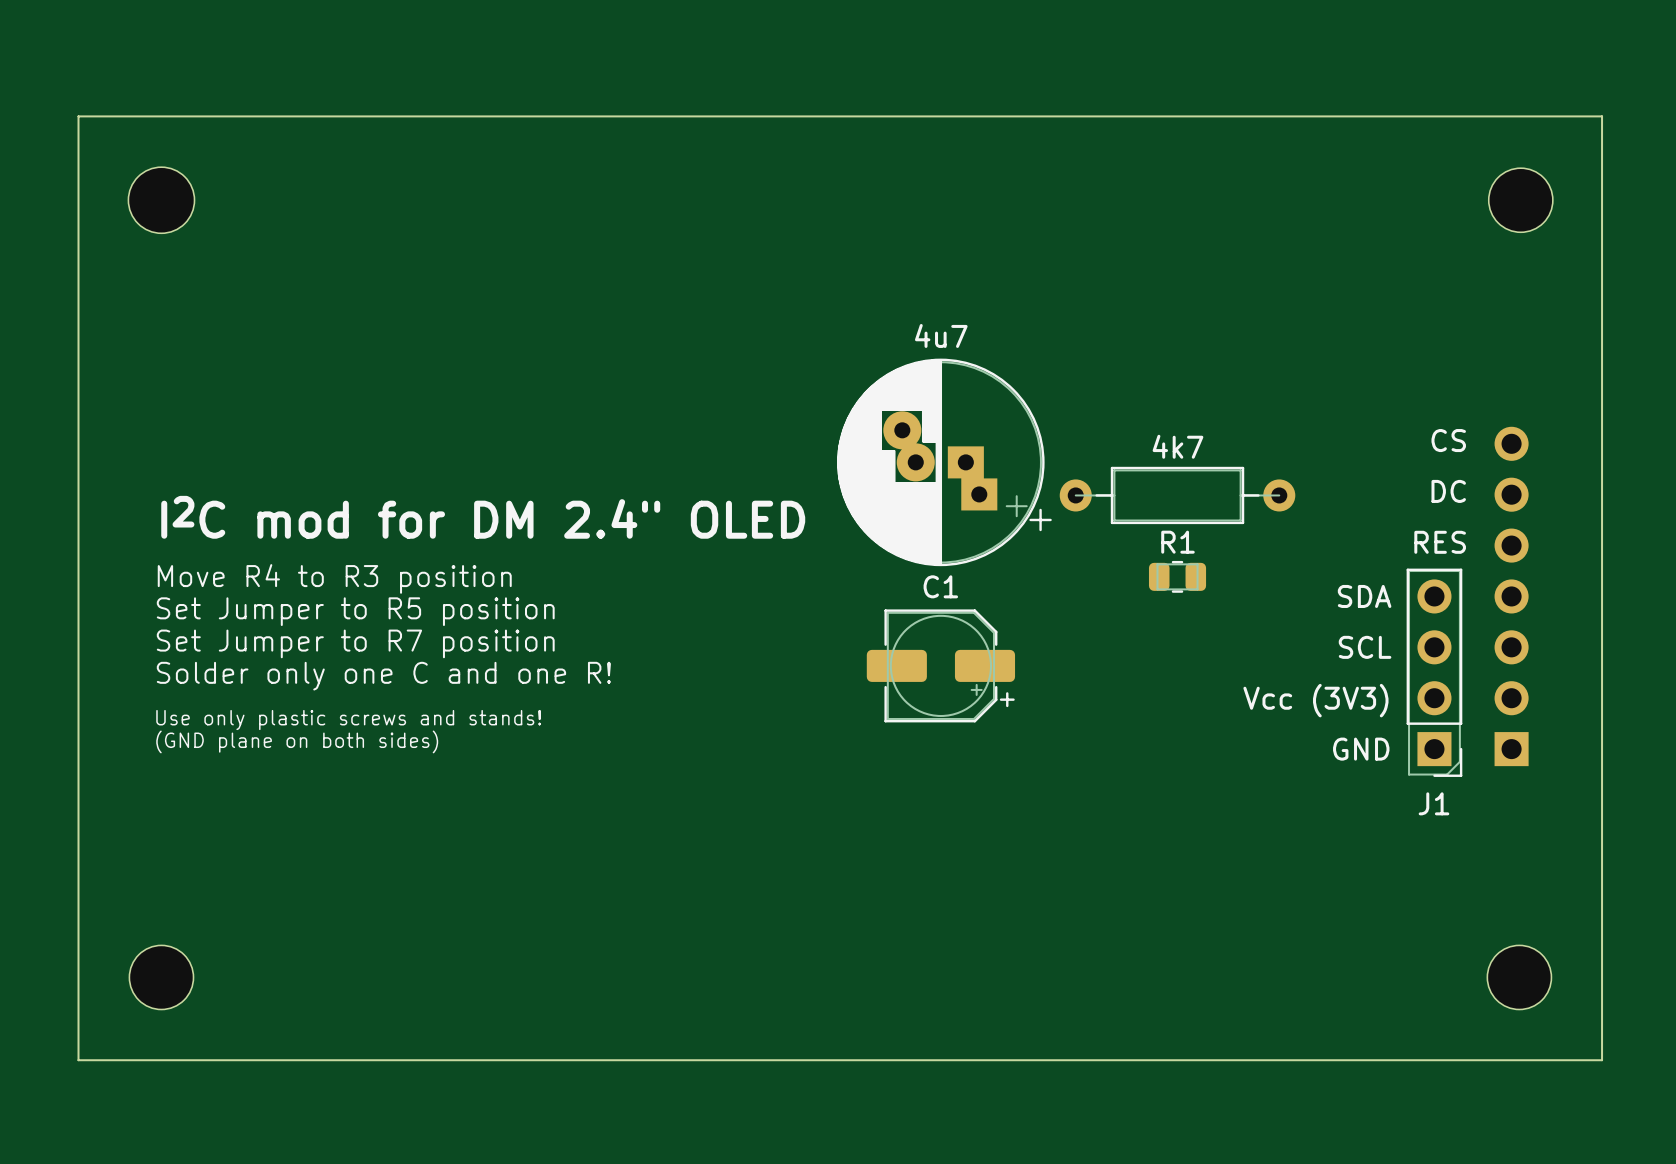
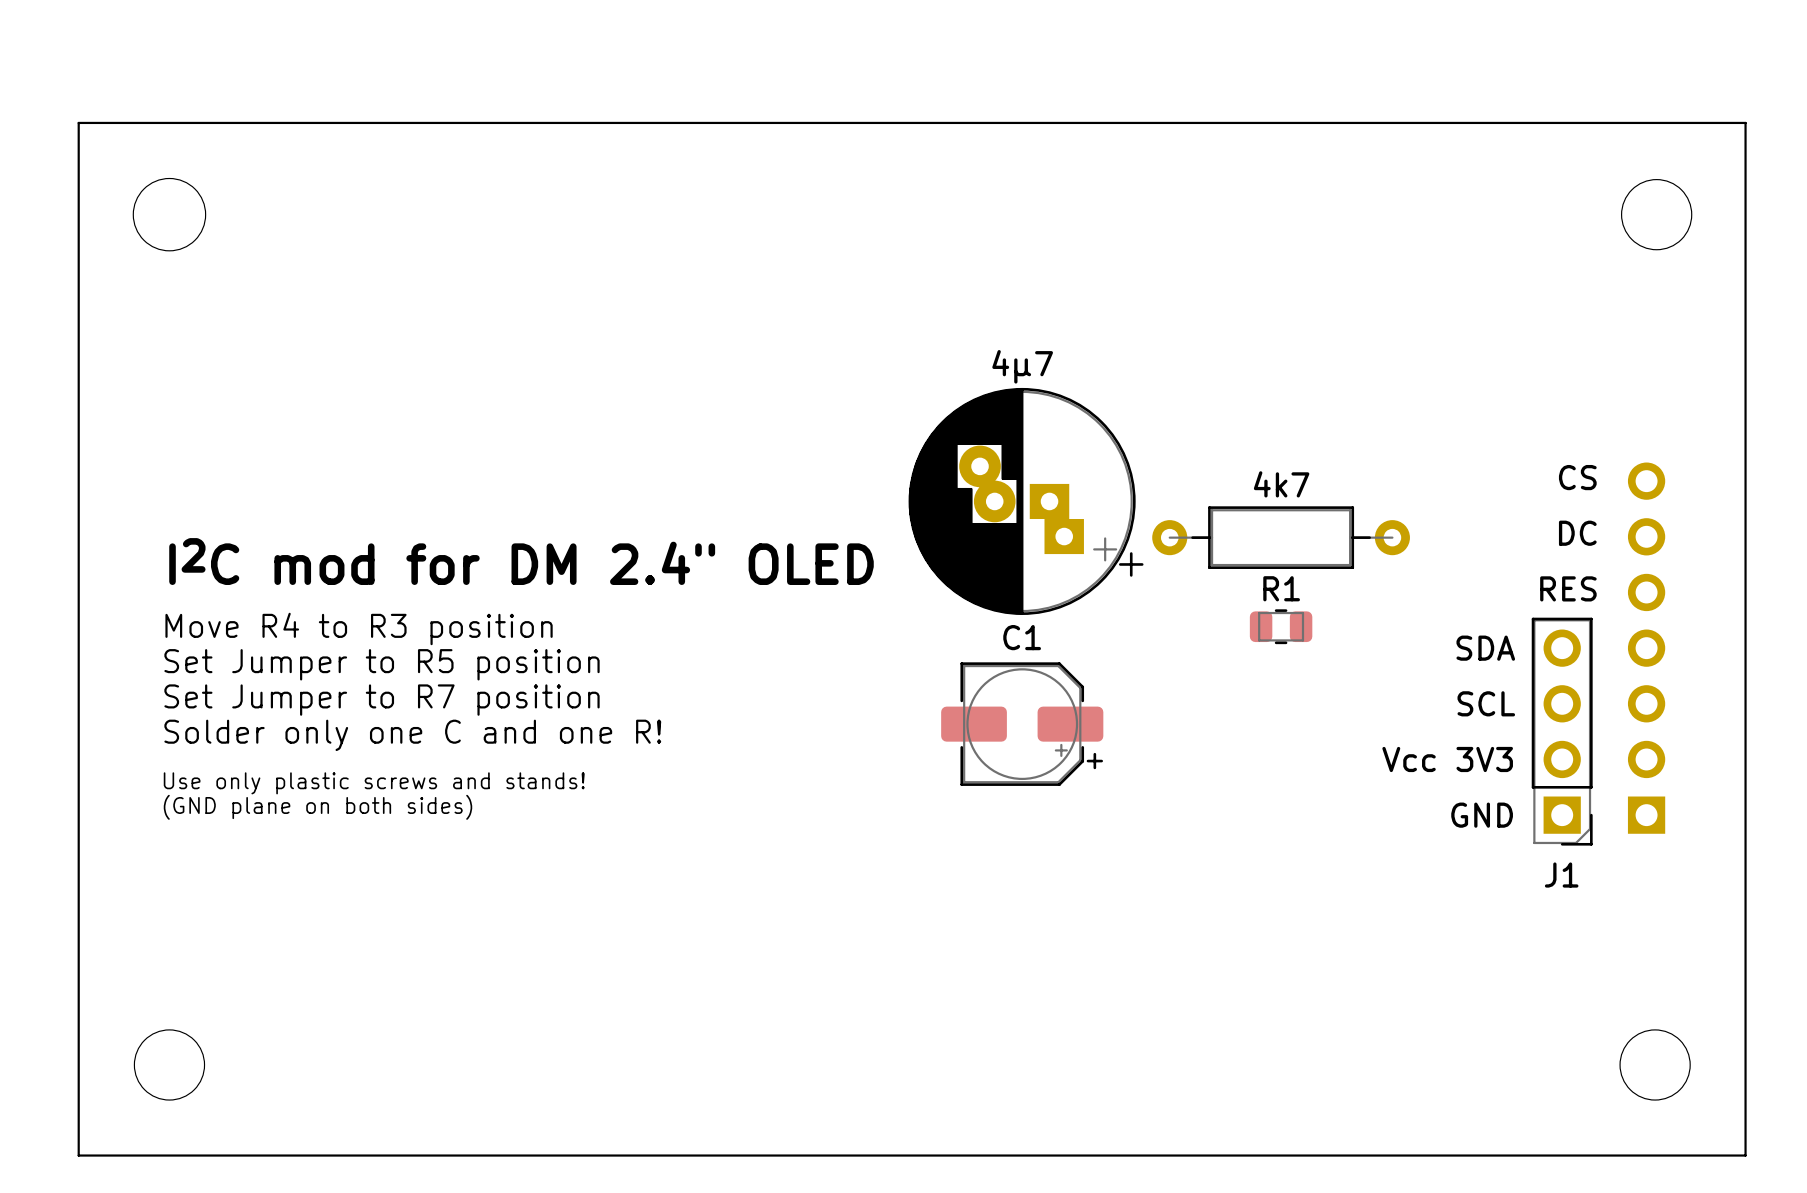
C1 value: 4u7 (941, 335) -> 4µ7 (1022, 366)
text: Vcc (3V3) (1315, 700) -> Vcc 3V3 (1447, 759)

